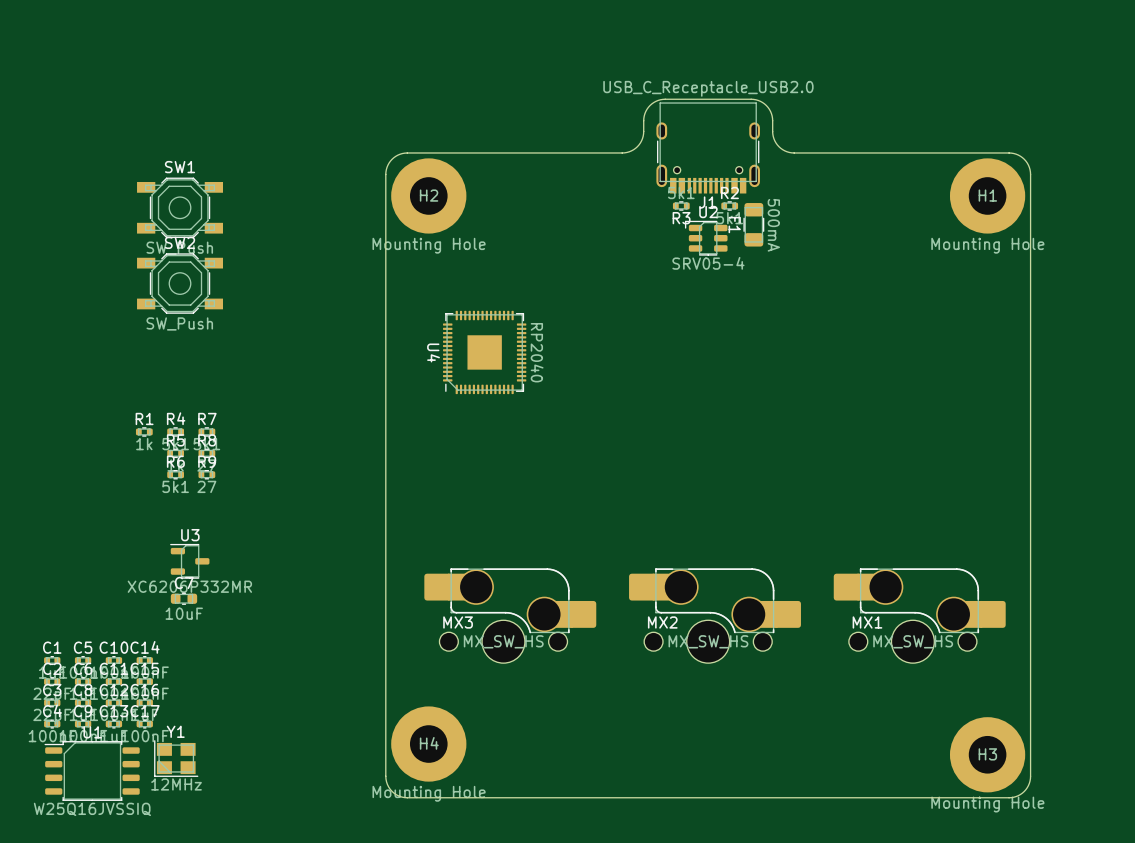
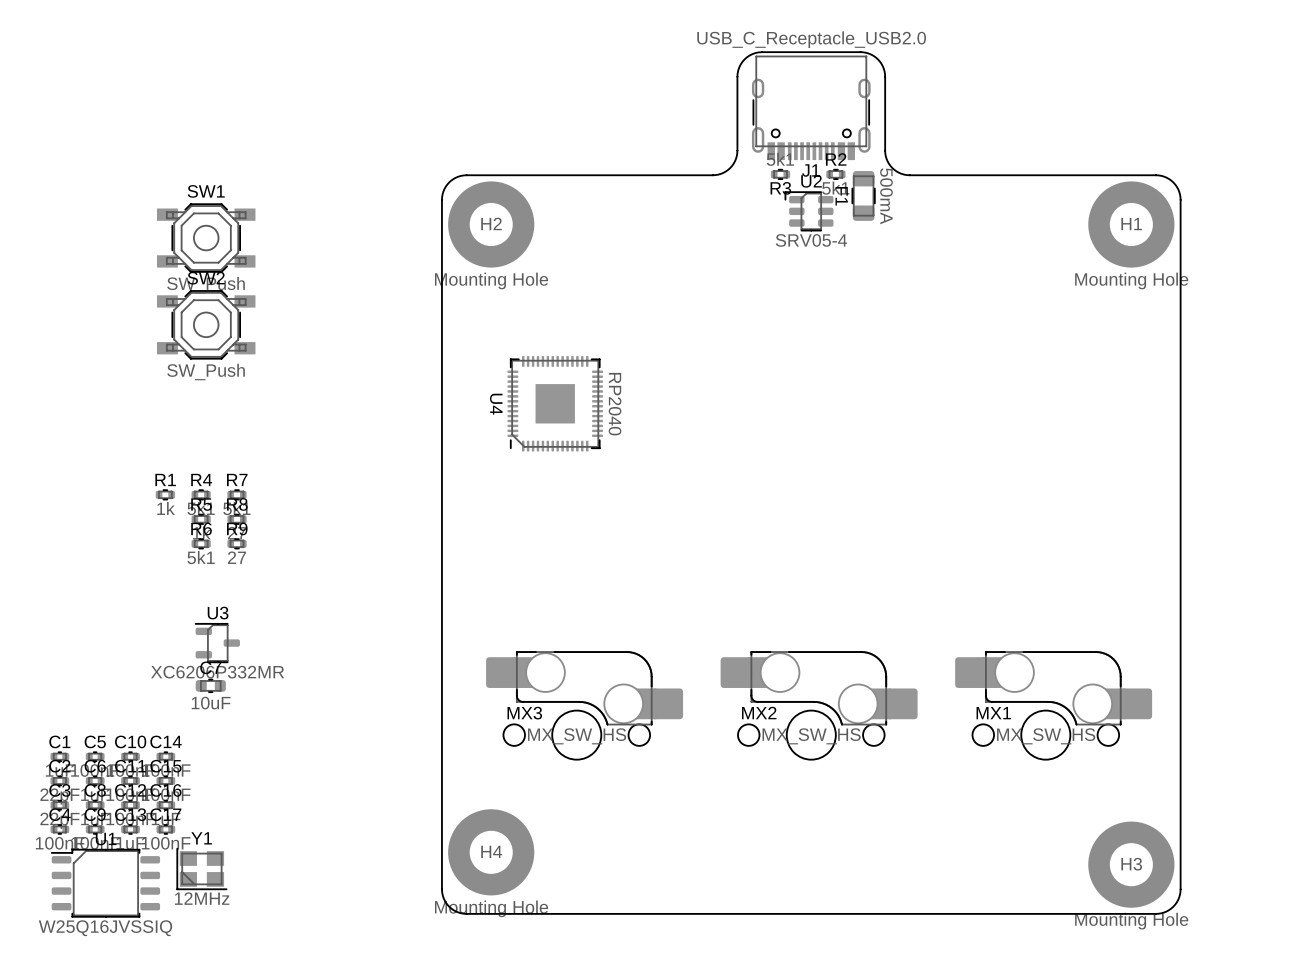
board edge: (772, 120) (771, 113) (766, 105) (760, 101) (751, 99) (660, 99) (648, 107) (643, 120) -> (885, 138) (884, 71) (875, 57) (860, 52) (762, 52) (747, 57) (740, 64) (737, 73) (737, 138)
J1 position: (708, 147) -> (811, 107)
R3 position: (681, 205) -> (780, 174)
R2 position: (729, 205) -> (835, 174)
F1 position: (753, 224) -> (863, 195)
U2 position: (706, 238) -> (809, 211)

